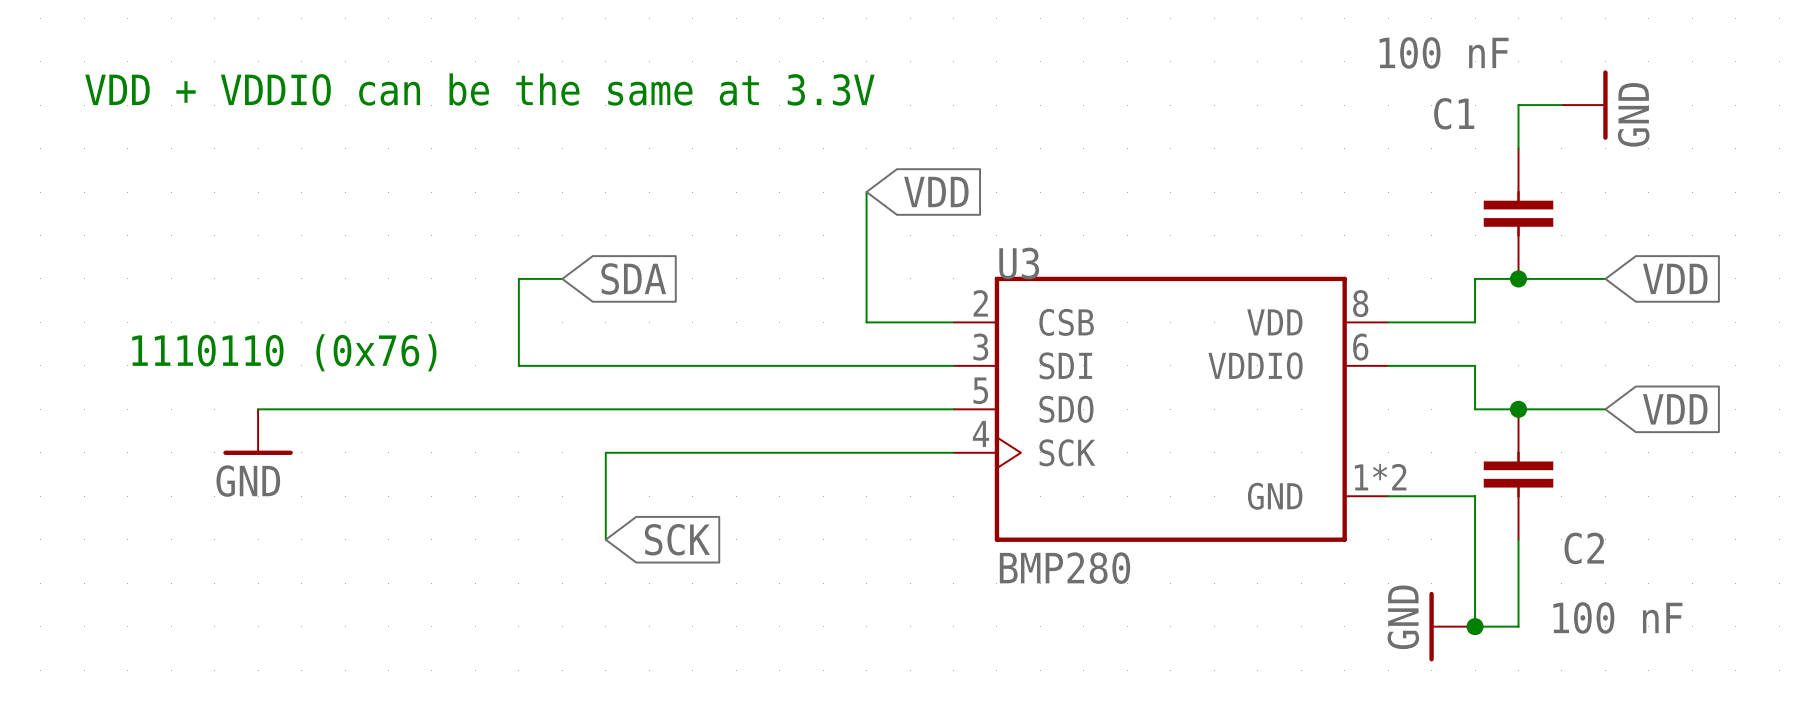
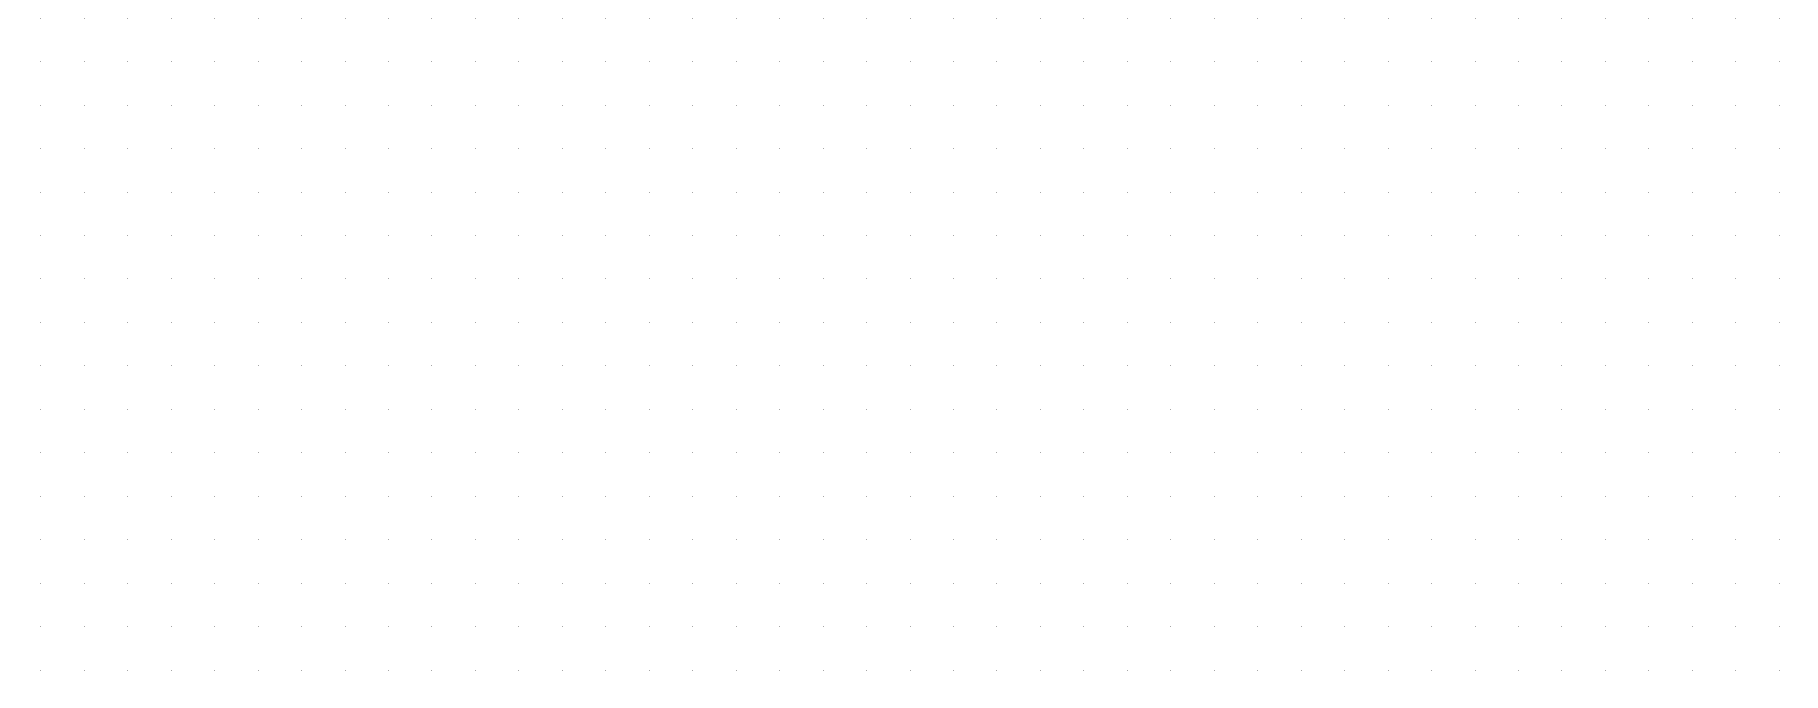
text: VDD + VDDIO can be the same at 3.3V (479, 89) -> none
wire: (1561, 105) (1518, 105) (1518, 148) -> none
power symbol: GND (1584, 105) -> none
wire: (866, 192) (866, 322) (953, 322) -> none
global label: VDD (936, 192) -> none
C1: 100 nF (1518, 213) -> none
wire: (562, 278) (518, 278) (518, 365) (953, 365) -> none
global label: SDA (633, 278) -> none
junction: (1518, 278) -> none
wire: (1605, 278) (1475, 278) (1475, 322) (1388, 322) -> none
global label: VDD (1675, 278) -> none
text: 1110110 (0x76) (284, 352) -> none
wire: (1388, 365) (1475, 365) (1475, 409) (1605, 409) -> none
wire: (258, 409) (953, 409) -> none
U3: BMP280 (1170, 409) -> none
junction: (1518, 409) -> none
global label: VDD (1675, 409) -> none
power symbol: GND (258, 432) -> none
wire: (953, 452) (605, 452) (605, 539) -> none
C2: 100 nF (1518, 474) -> none
wire: (1388, 496) (1475, 496) (1475, 626) (1518, 626) (1518, 539) -> none
global label: SCK (677, 539) -> none
power symbol: GND (1452, 626) -> none
junction: (1475, 626) -> none

